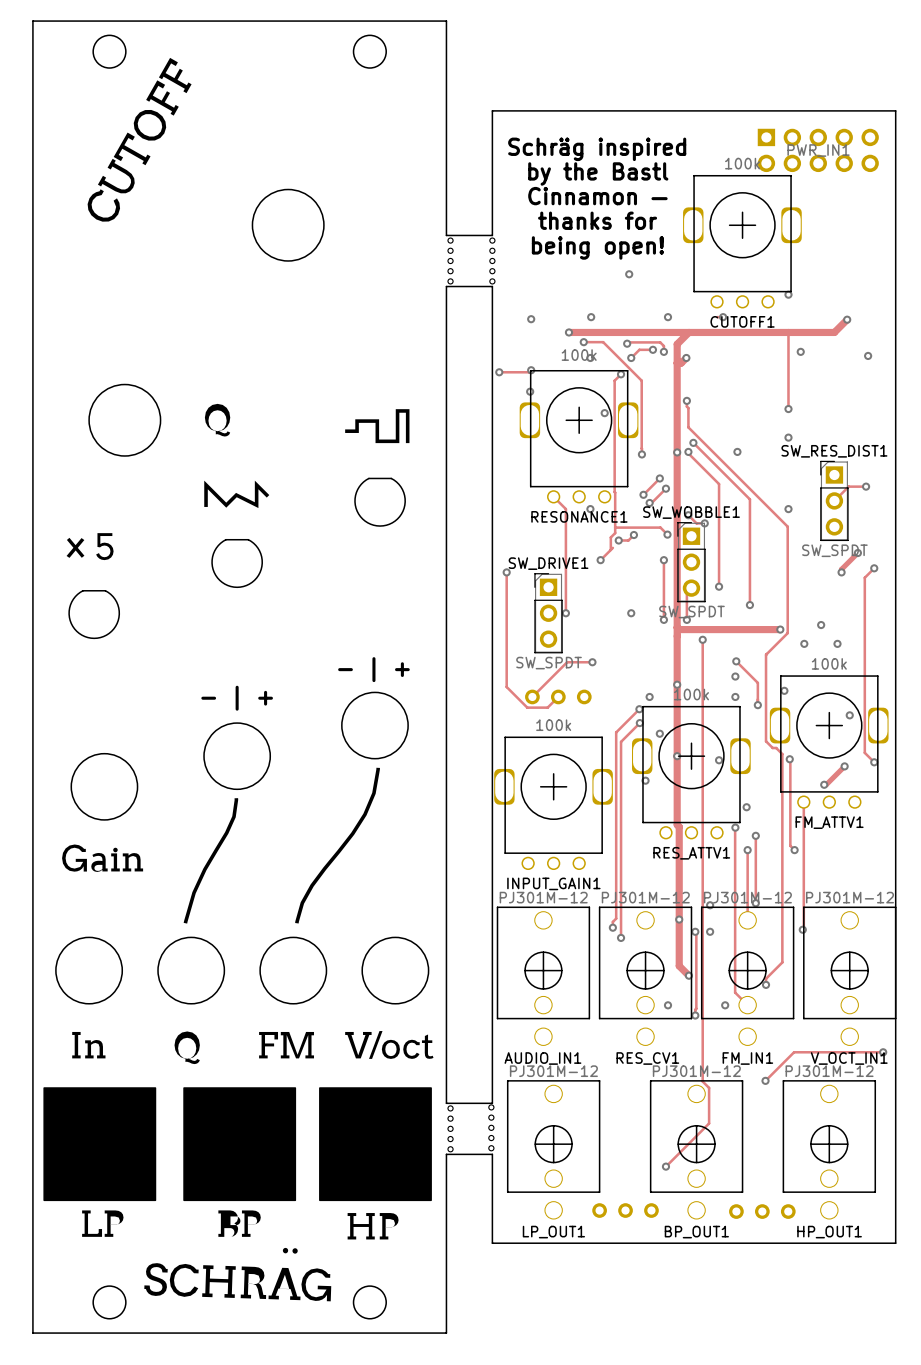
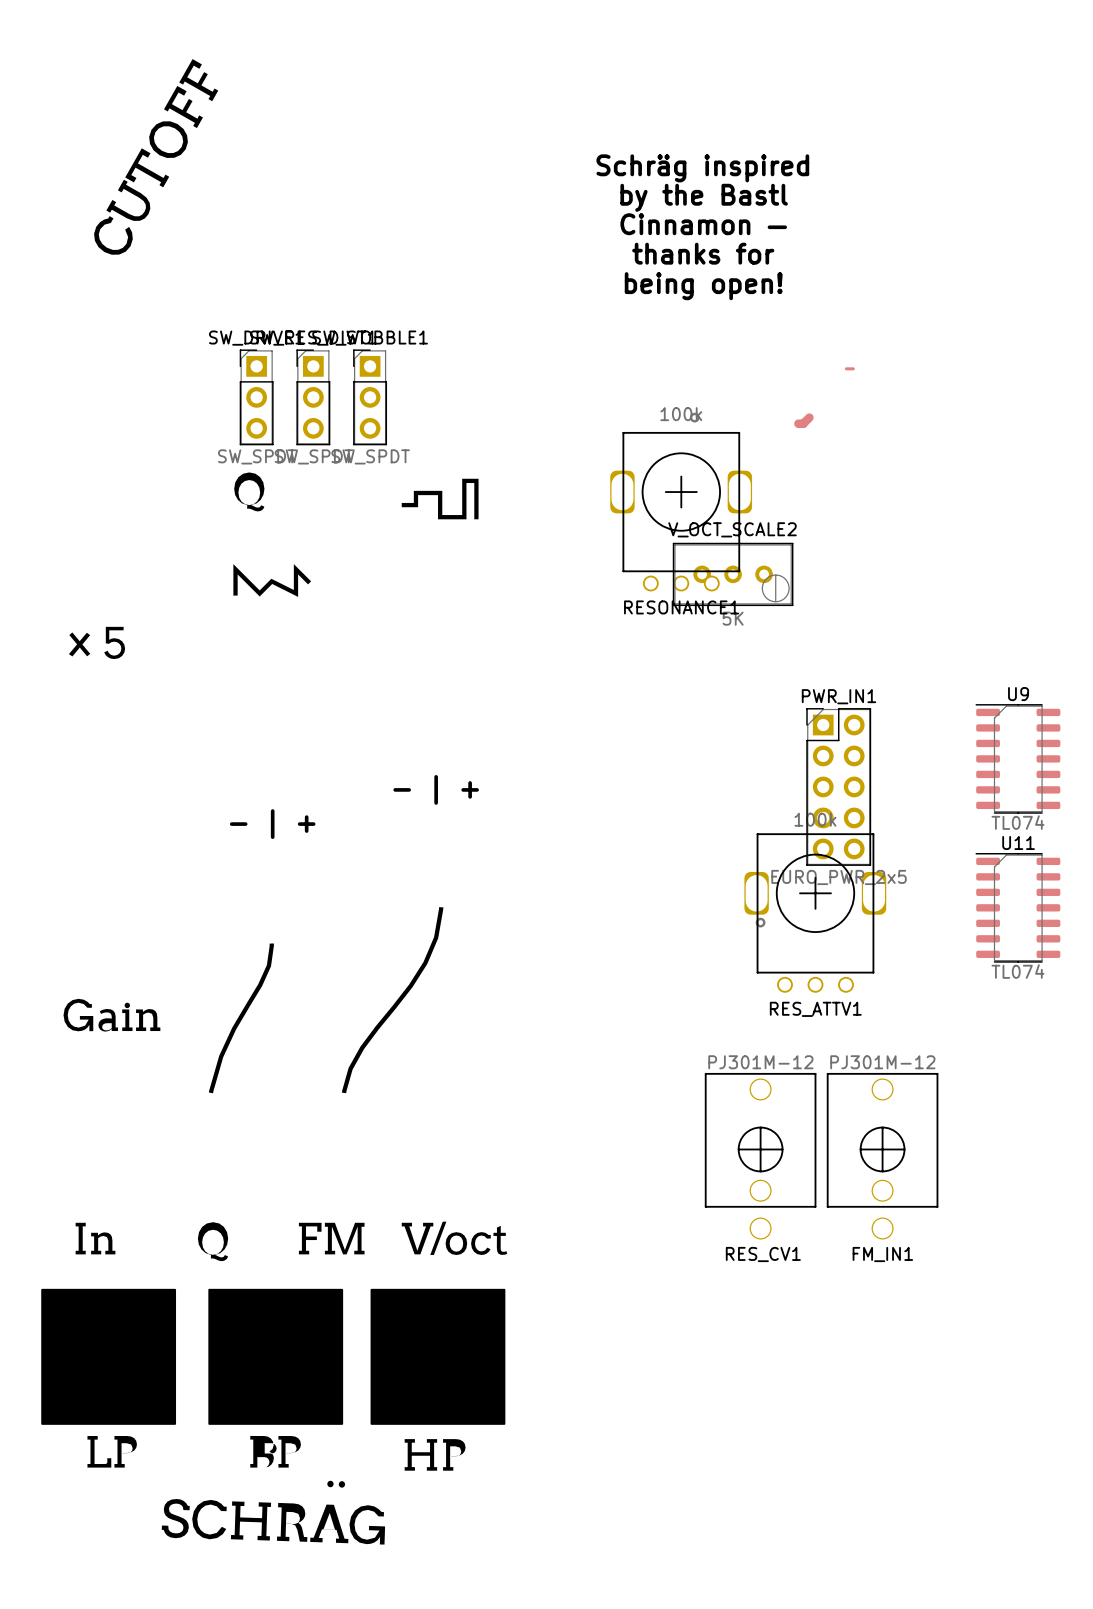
board edge: (32, 21) (32, 1333) (446, 1333) (446, 1154) (492, 1154) (492, 1243) (895, 1243) (895, 110) (492, 110) (492, 235) (446, 235) (446, 21) (32, 21) -> none
round board edge: [92, 34, 127, 69] -> none
round board edge: [352, 34, 387, 69] -> none
PWR_IN1 side: bottom (818, 150) -> top (838, 786)
round board edge: [251, 188, 325, 262] -> none
CUTOFF1: 100k (742, 241) -> none
part: (450, 260) -> none
part: (492, 260) -> none
via: (629, 274) -> none
board edge: (446, 286) (446, 1103) (492, 1103) (492, 286) (446, 286) -> none
via: (788, 294) -> none
via: (591, 317) -> none
via: (668, 317) -> none
via: (723, 317) -> none
via: (531, 319) -> none
track: (847, 319) (834, 332) (568, 332) -> none
via: (847, 319) -> none
via: (568, 332) -> none
track: (688, 332) (677, 344) (677, 824) (679, 826) (679, 966) (688, 975) -> none
track: (788, 332) (788, 409) -> none
track: (583, 342) (603, 342) (641, 380) (641, 454) -> none
via: (583, 342) -> none
track: (627, 343) (660, 342) (663, 346) (663, 351) -> none
via: (627, 343) -> none
track: (652, 349) (639, 349) (631, 357) -> none
via: (652, 349) -> none
via: (663, 351) -> none
via: (800, 351) -> none
via: (868, 355) -> none
via: (631, 357) -> none
via: (686, 357) -> none
track: (531, 370) (529, 372) (499, 372) -> none
via: (531, 370) -> none
via: (499, 372) -> none
track: (621, 374) (614, 380) (615, 533) (610, 537) (610, 549) -> none
via: (621, 374) -> none
round board edge: [88, 383, 162, 457] -> none
via: (530, 391) -> none
track: (686, 400) (688, 427) (787, 526) (787, 633) (766, 654) (766, 741) (782, 754) (782, 962) (766, 978) (766, 984) -> none
via: (686, 400) -> none
via: (788, 409) -> none
via: (604, 413) -> none
via: (788, 437) -> none
track: (693, 442) (749, 499) (749, 605) -> none
via: (693, 442) -> none
track: (688, 451) (719, 484) (719, 586) -> none
via: (688, 451) -> none
via: (737, 451) -> none
via: (677, 452) -> none
via: (641, 454) -> none
board edge: (368, 478) (391, 478) (402, 489) (405, 498) (404, 508) (399, 516) (392, 522) (383, 525) (373, 525) (365, 521) (358, 514) (355, 505) (355, 495) (359, 486) (368, 478) -> none
track: (659, 478) (643, 494) -> none
via: (659, 478) -> none
track: (866, 486) (848, 486) (834, 500) -> none
via: (866, 486) -> none
track: (665, 488) (649, 502) -> none
via: (665, 488) -> none
V_OCT_SCALE2: none -> 5K (733, 574)
via: (643, 494) -> none
track: (553, 496) (565, 509) (565, 613) -> none
SW_RES_DIST1 position: (834, 500) -> (313, 397)
via: (649, 502) -> none
via: (590, 509) -> none
via: (788, 509) -> none
track: (688, 515) (696, 523) (704, 523) -> none
via: (688, 515) -> none
via: (704, 523) -> none
track: (615, 527) (660, 527) (667, 534) -> none
via: (667, 534) -> none
track: (633, 535) (628, 540) (618, 540) -> none
via: (633, 535) -> none
board edge: (225, 539) (248, 539) (259, 550) (262, 560) (261, 569) (256, 577) (249, 584) (240, 587) (230, 586) (222, 582) (215, 575) (212, 566) (212, 556) (218, 545) (225, 539) -> none
via: (618, 540) -> none
track: (612, 547) (600, 560) -> none
track: (857, 553) (841, 569) (841, 572) -> none
via: (857, 553) -> none
via: (600, 560) -> none
track: (663, 560) (663, 619) -> none
via: (663, 560) -> none
SW_WOBBLE1 position: (691, 562) -> (370, 397)
track: (874, 568) (864, 577) (864, 752) (874, 762) -> none
via: (874, 568) -> none
track: (506, 572) (506, 687) (527, 707) (547, 707) (558, 696) -> none
via: (506, 572) -> none
via: (841, 572) -> none
via: (719, 586) -> none
track: (691, 588) (686, 592) (686, 619) -> none
board edge: (82, 590) (105, 590) (116, 601) (119, 611) (118, 620) (113, 628) (106, 635) (94, 638) (84, 636) (76, 631) (71, 623) (69, 614) (70, 604) (75, 596) (82, 590) -> none
via: (749, 605) -> none
SW_DRIVE1 position: (548, 613) -> (256, 397)
via: (565, 613) -> none
via: (631, 613) -> none
via: (663, 619) -> none
via: (686, 619) -> none
via: (821, 625) -> none
track: (677, 627) (679, 629) (780, 629) -> none
via: (780, 629) -> none
track: (702, 639) (702, 1081) (709, 1087) (709, 1123) (665, 1166) -> none
via: (702, 639) -> none
via: (804, 643) -> none
via: (837, 643) -> none
U9: none -> TL074 (1017, 758)
track: (736, 661) (757, 682) (757, 705) -> none
via: (736, 661) -> none
track: (592, 662) (567, 662) (532, 696) -> none
via: (592, 662) -> none
via: (735, 676) -> none
via: (677, 684) -> none
via: (784, 690) -> none
round board edge: [341, 691, 409, 760] -> none
part: (558, 696) -> none
via: (649, 696) -> none
via: (735, 696) -> none
via: (757, 705) -> none
track: (639, 709) (616, 732) (616, 918) (612, 921) (612, 927) -> none
via: (639, 709) -> none
via: (849, 715) -> none
round board edge: [203, 722, 272, 791] -> none
track: (639, 723) (621, 741) (621, 937) -> none
via: (639, 723) -> none
via: (659, 733) -> none
FM_ATTV1: 100k (829, 742) -> none
round board edge: [70, 752, 139, 821] -> none
via: (677, 756) -> none
track: (789, 759) (790, 845) (794, 850) -> none
via: (789, 759) -> none
via: (719, 760) -> none
via: (874, 762) -> none
track: (844, 766) (824, 784) -> none
via: (844, 766) -> none
U11: none -> TL074 (1017, 907)
via: (824, 784) -> none
track: (803, 802) (802, 929) -> none
INPUT_GAIN1: 100k (553, 803) -> none
via: (746, 807) -> none
track: (735, 827) (735, 992) (747, 1005) -> none
via: (735, 827) -> none
track: (755, 835) (755, 903) -> none
via: (755, 835) -> none
track: (747, 850) (747, 920) -> none
via: (747, 850) -> none
via: (794, 850) -> none
via: (755, 903) -> none
via: (710, 905) -> none
via: (679, 919) -> none
via: (612, 927) -> none
via: (802, 929) -> none
track: (695, 931) (695, 1015) -> none
via: (695, 931) -> none
via: (710, 931) -> none
round board edge: [55, 936, 124, 1005] -> none
round board edge: [157, 936, 226, 1005] -> none
round board edge: [259, 936, 328, 1005] -> none
round board edge: [361, 936, 430, 1005] -> none
via: (621, 937) -> none
via: (688, 975) -> none
AUDIO_IN1: PJ301M-12 (543, 976) -> none
V_OCT_IN1: PJ301M-12 (849, 976) -> none
via: (766, 984) -> none
via: (668, 1005) -> none
via: (725, 1005) -> none
via: (695, 1015) -> none
track: (883, 1052) (794, 1052) (765, 1080) -> none
via: (883, 1052) -> none
via: (765, 1080) -> none
part: (491, 1127) -> none
part: (450, 1128) -> none
LP_OUT1: PJ301M-12 (553, 1149) -> none
BP_OUT1: PJ301M-12 (696, 1149) -> none
HP_OUT1: PJ301M-12 (829, 1149) -> none
via: (665, 1166) -> none
part: (625, 1210) -> none
part: (762, 1211) -> none
round board edge: [92, 1285, 127, 1320] -> none
round board edge: [352, 1285, 387, 1320] -> none

